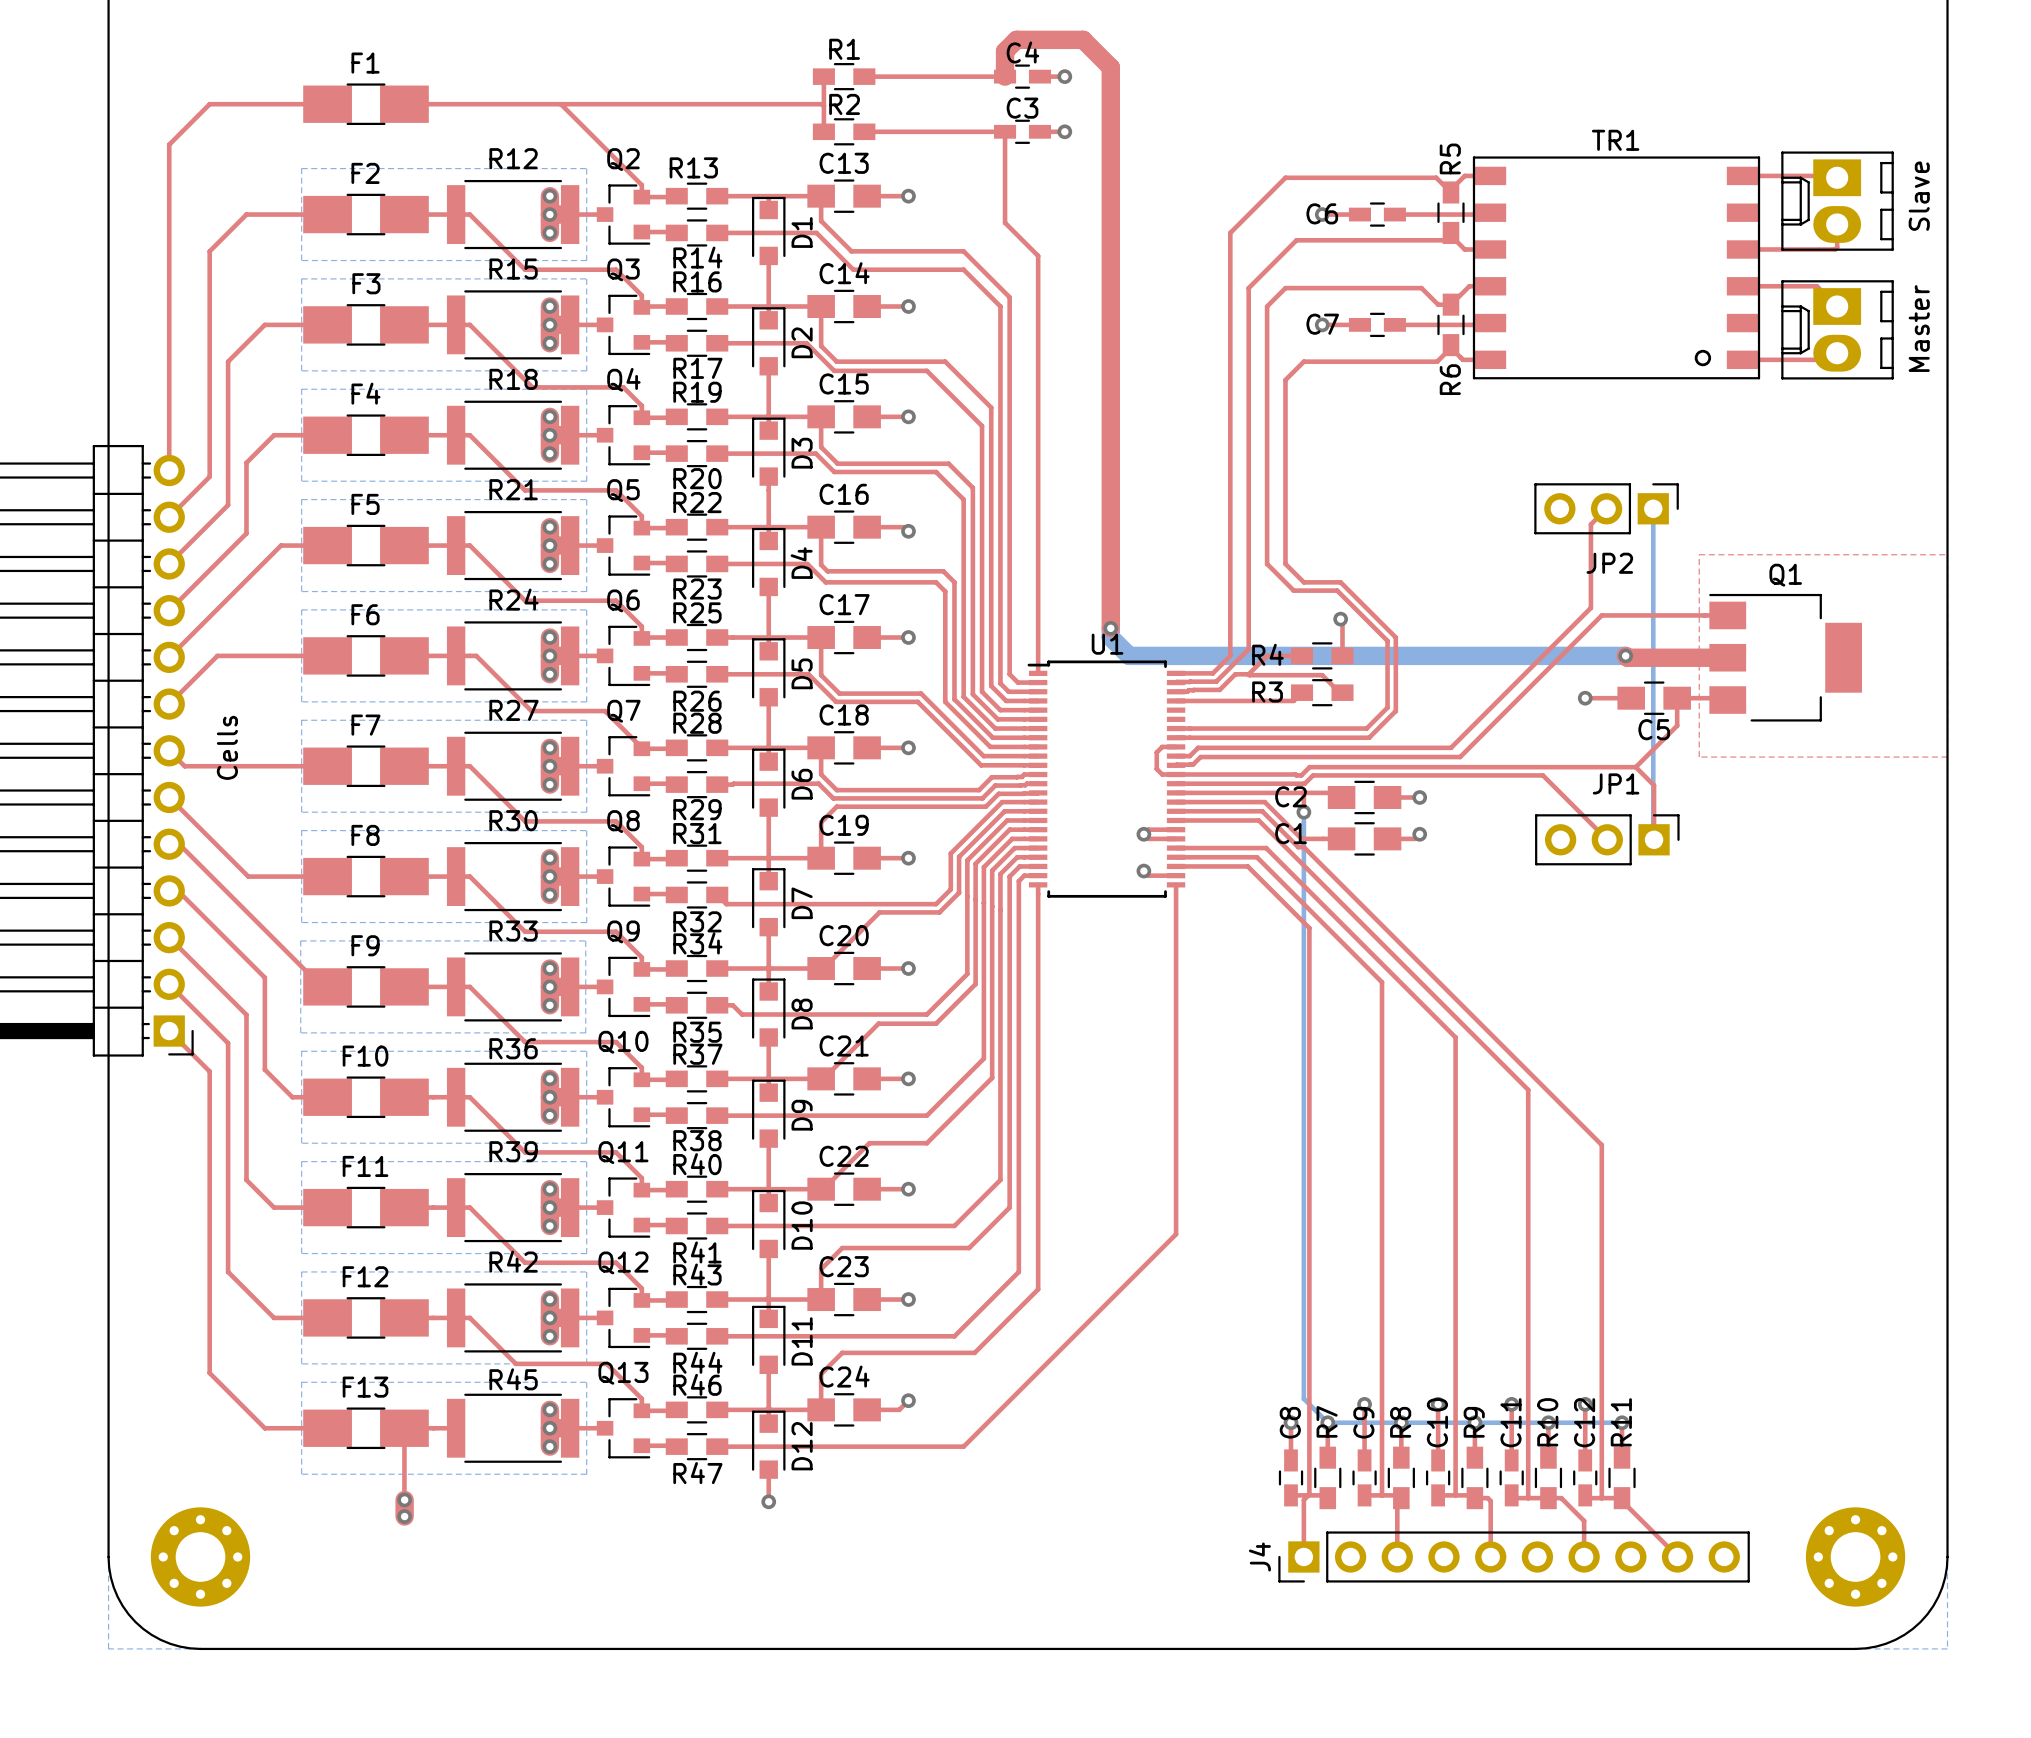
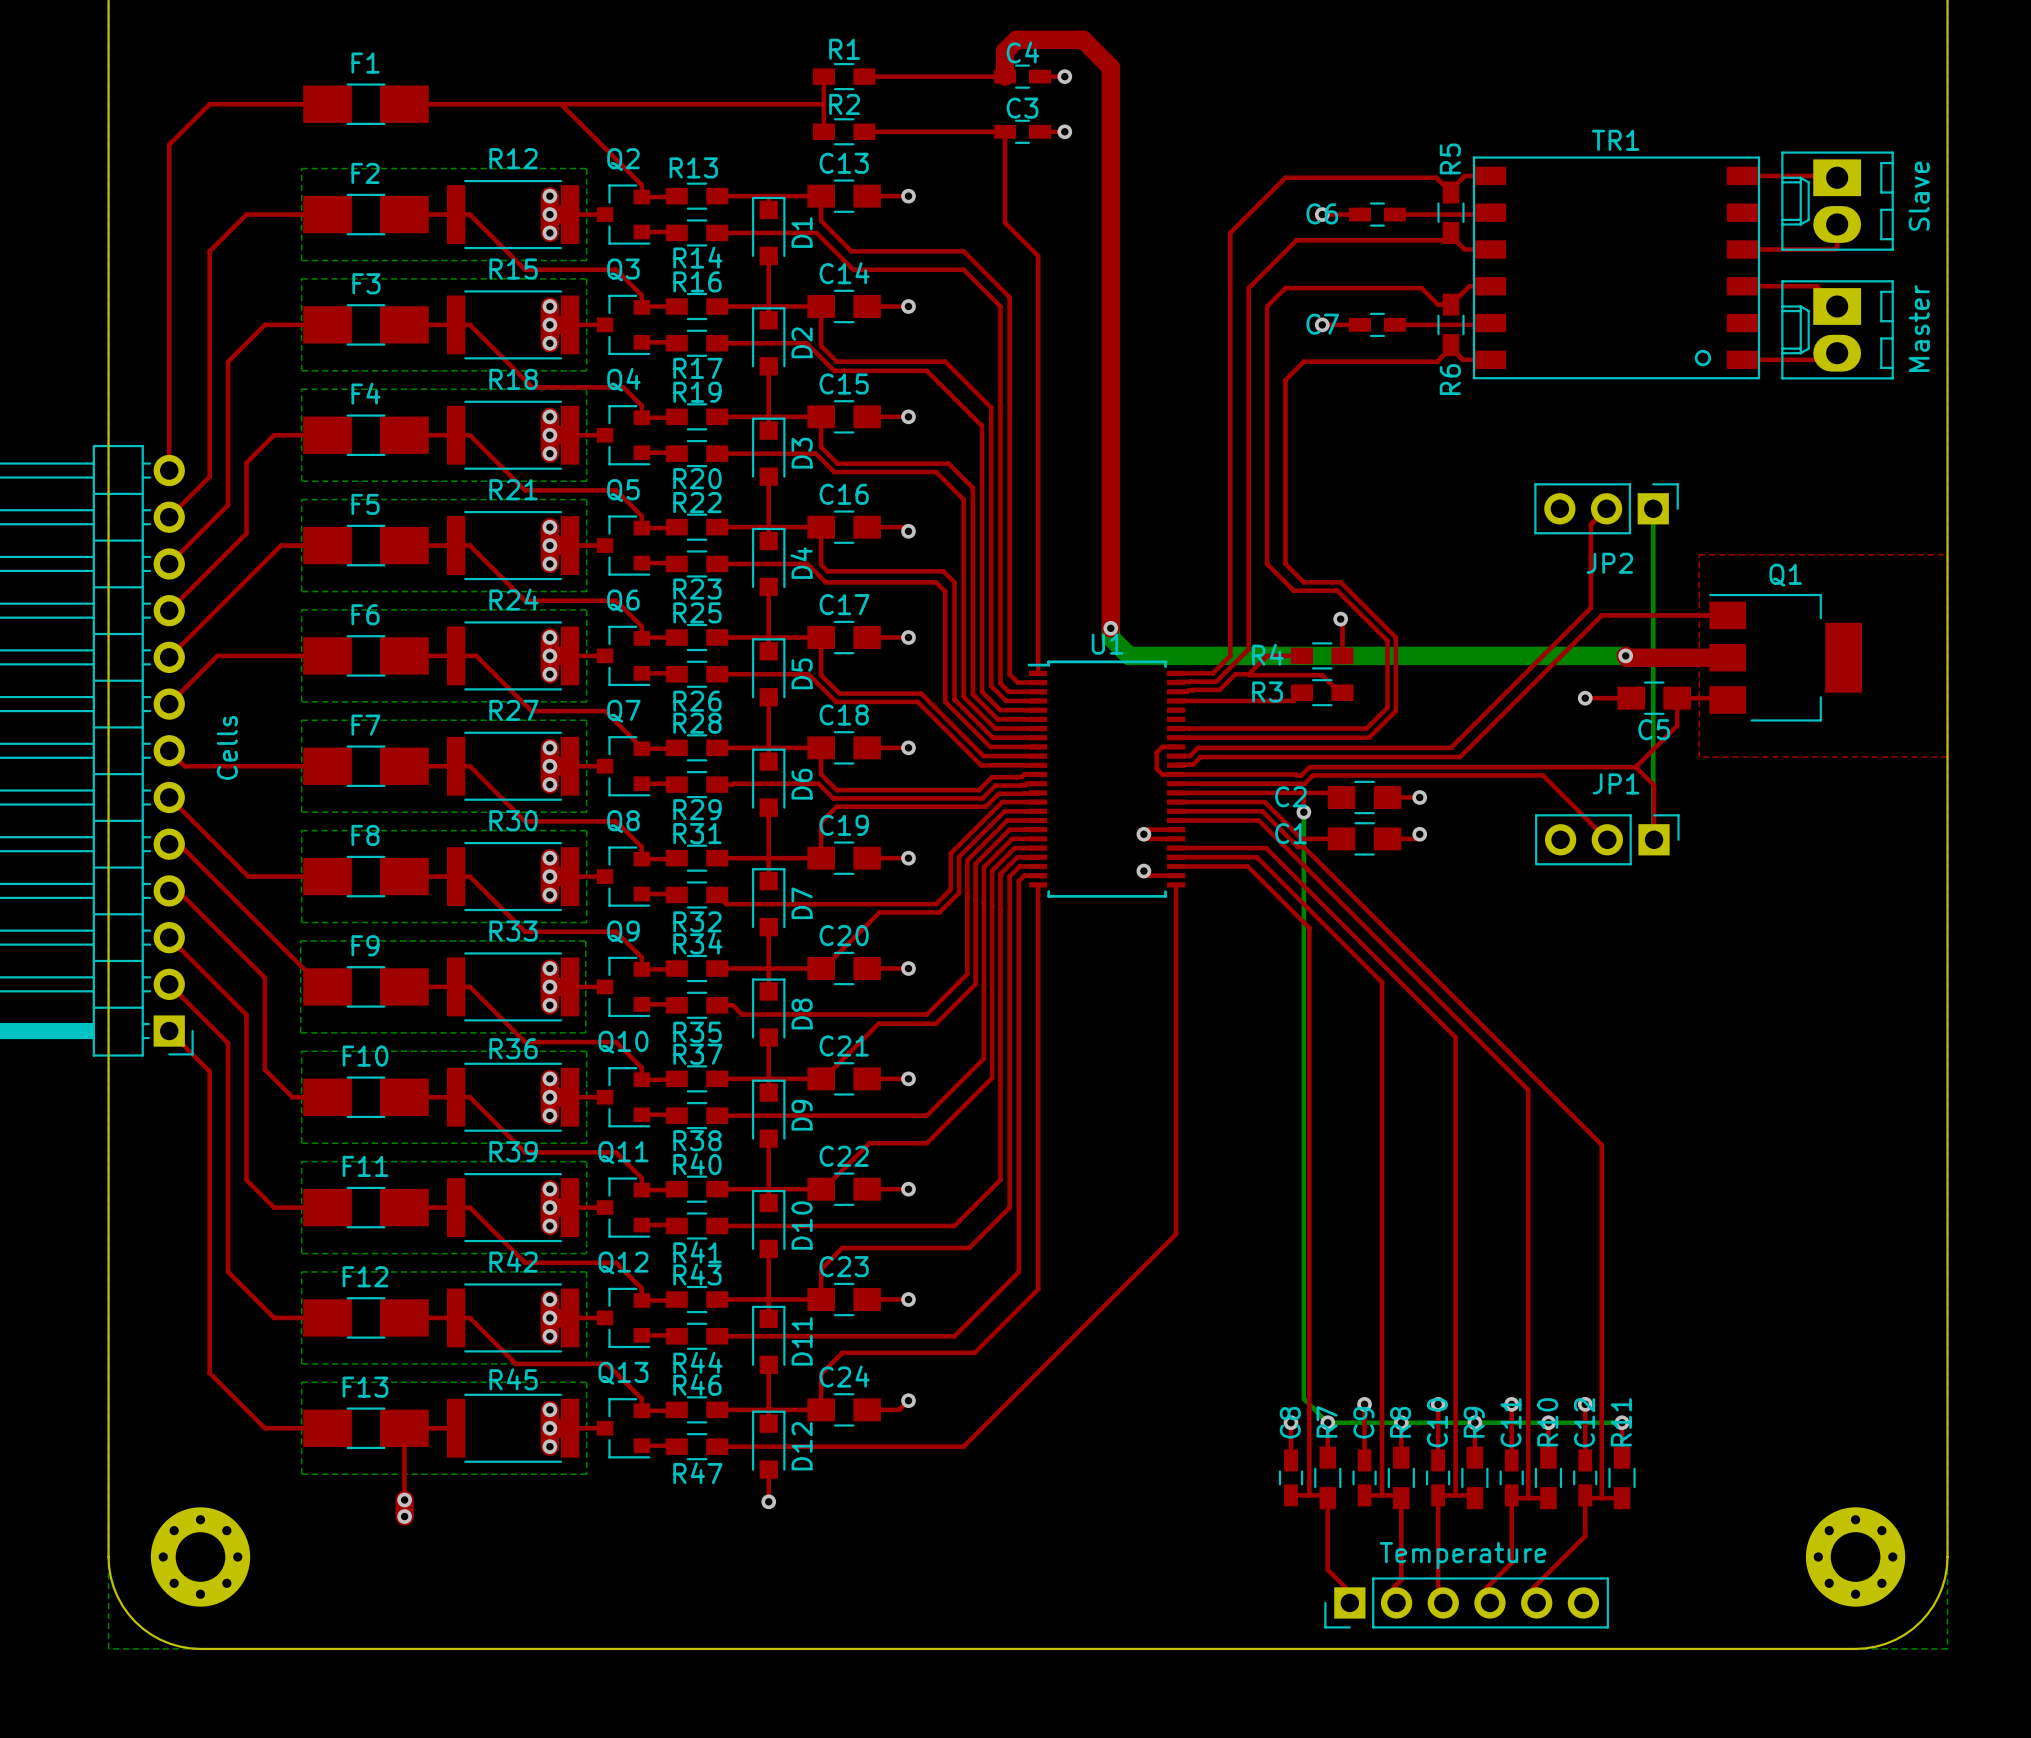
top track: (1308, 1495) (1303, 1499) (1303, 1556) -> none
top track: none -> (1438, 1495) (1439, 1588)
top track: none -> (1511, 1495) (1511, 1562) (1486, 1588)
top track: none -> (1585, 1495) (1585, 1536) (1533, 1588)
top track: none -> (1327, 1498) (1327, 1569) (1346, 1588)
top track: (1401, 1498) (1397, 1502) (1397, 1556) -> (1401, 1498) (1401, 1579) (1392, 1588)
top track: (1474, 1498) (1487, 1498) (1490, 1501) (1490, 1556) -> none
top track: (1548, 1498) (1561, 1498) (1584, 1520) (1584, 1556) -> none
top track: (1622, 1498) (1622, 1500) (1677, 1556) -> none
J4: (1514, 1556) -> none
part: none -> Temperature (1466, 1602)

